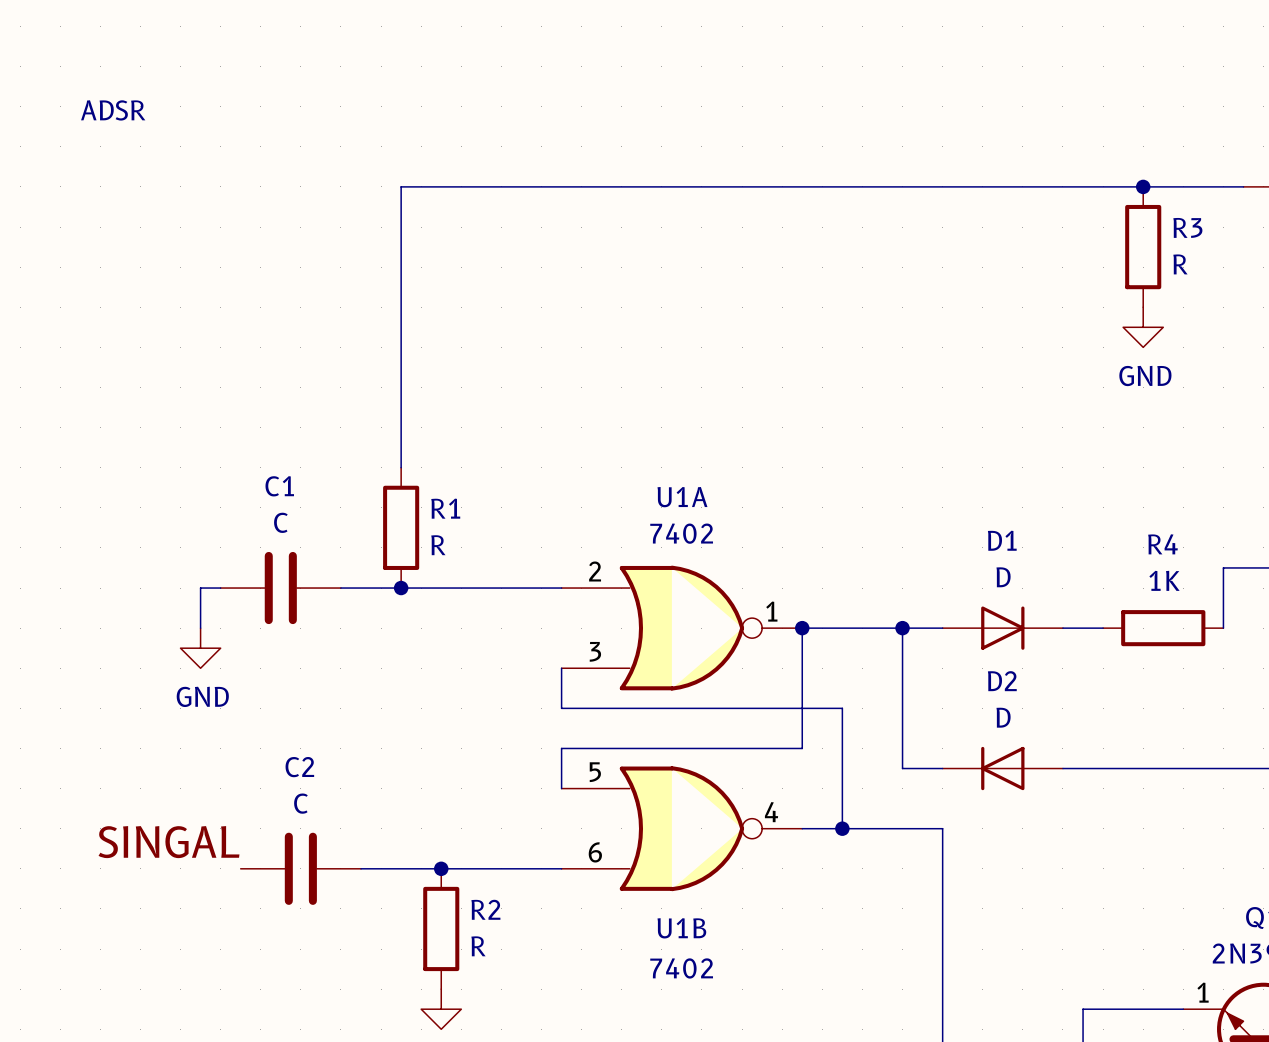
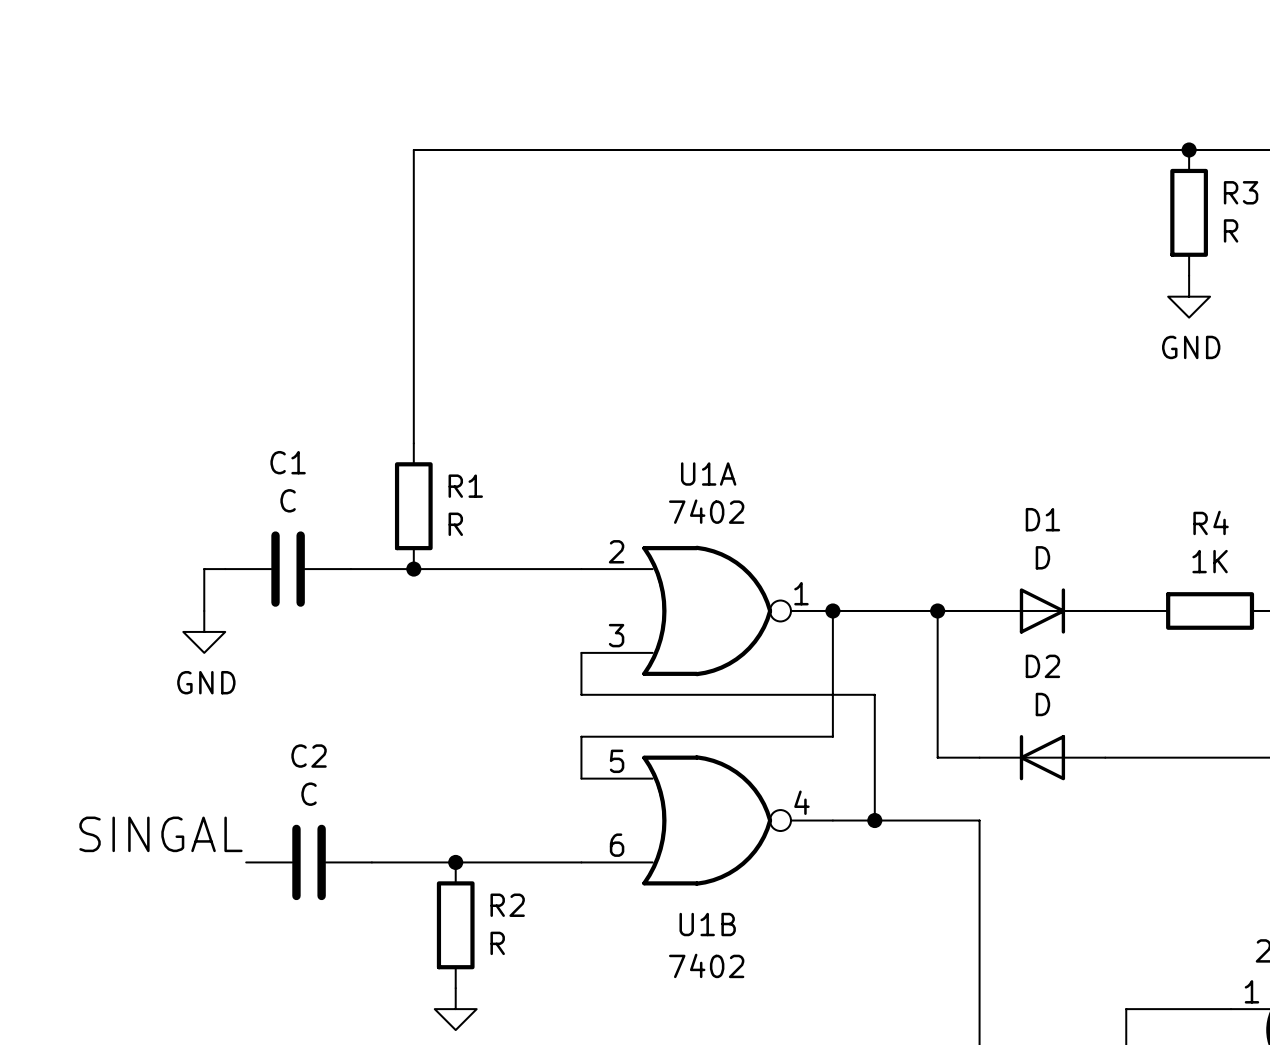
text: ADSR (113, 110) -> none

